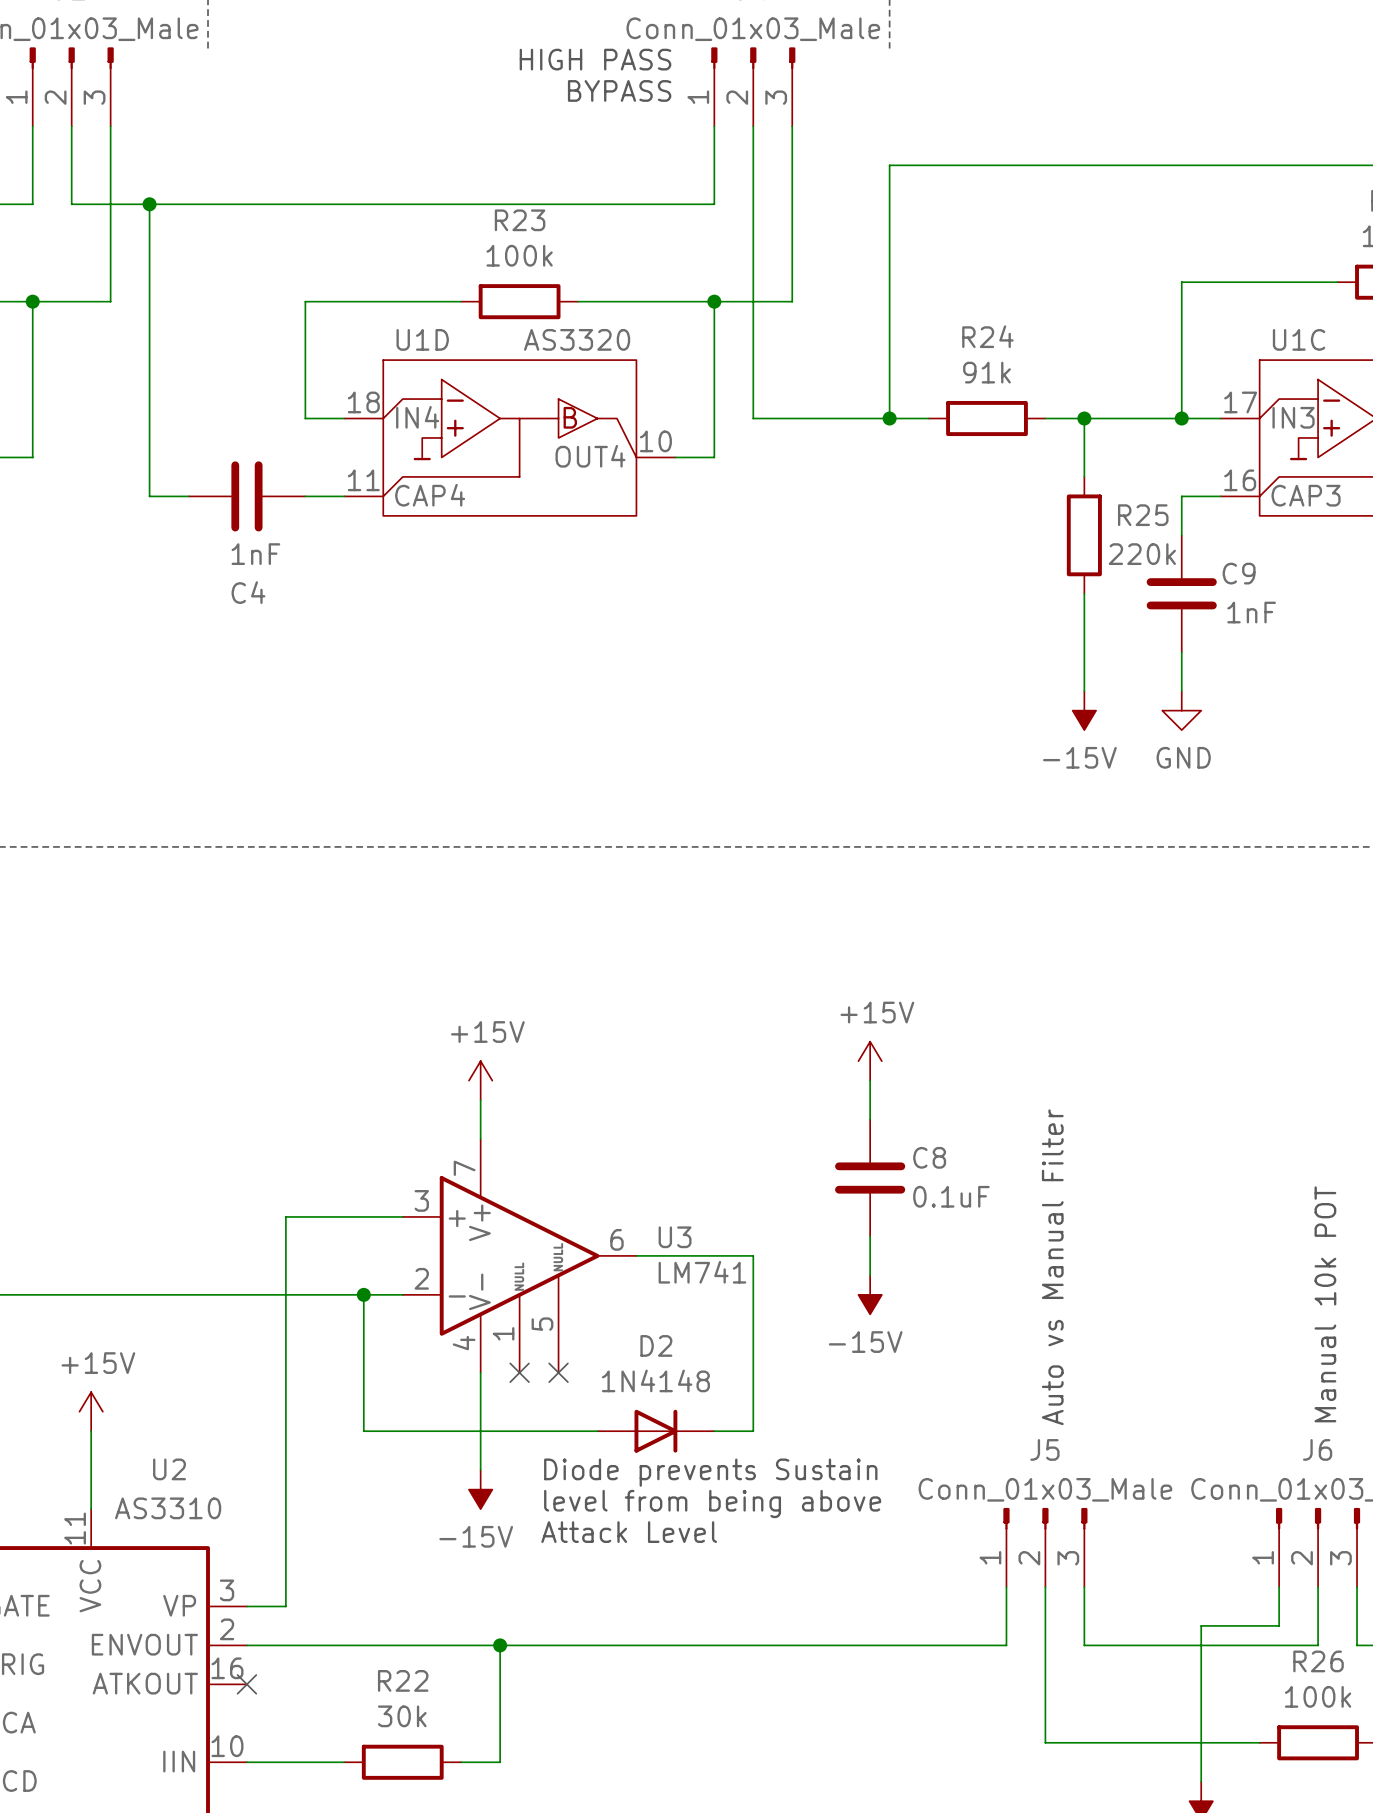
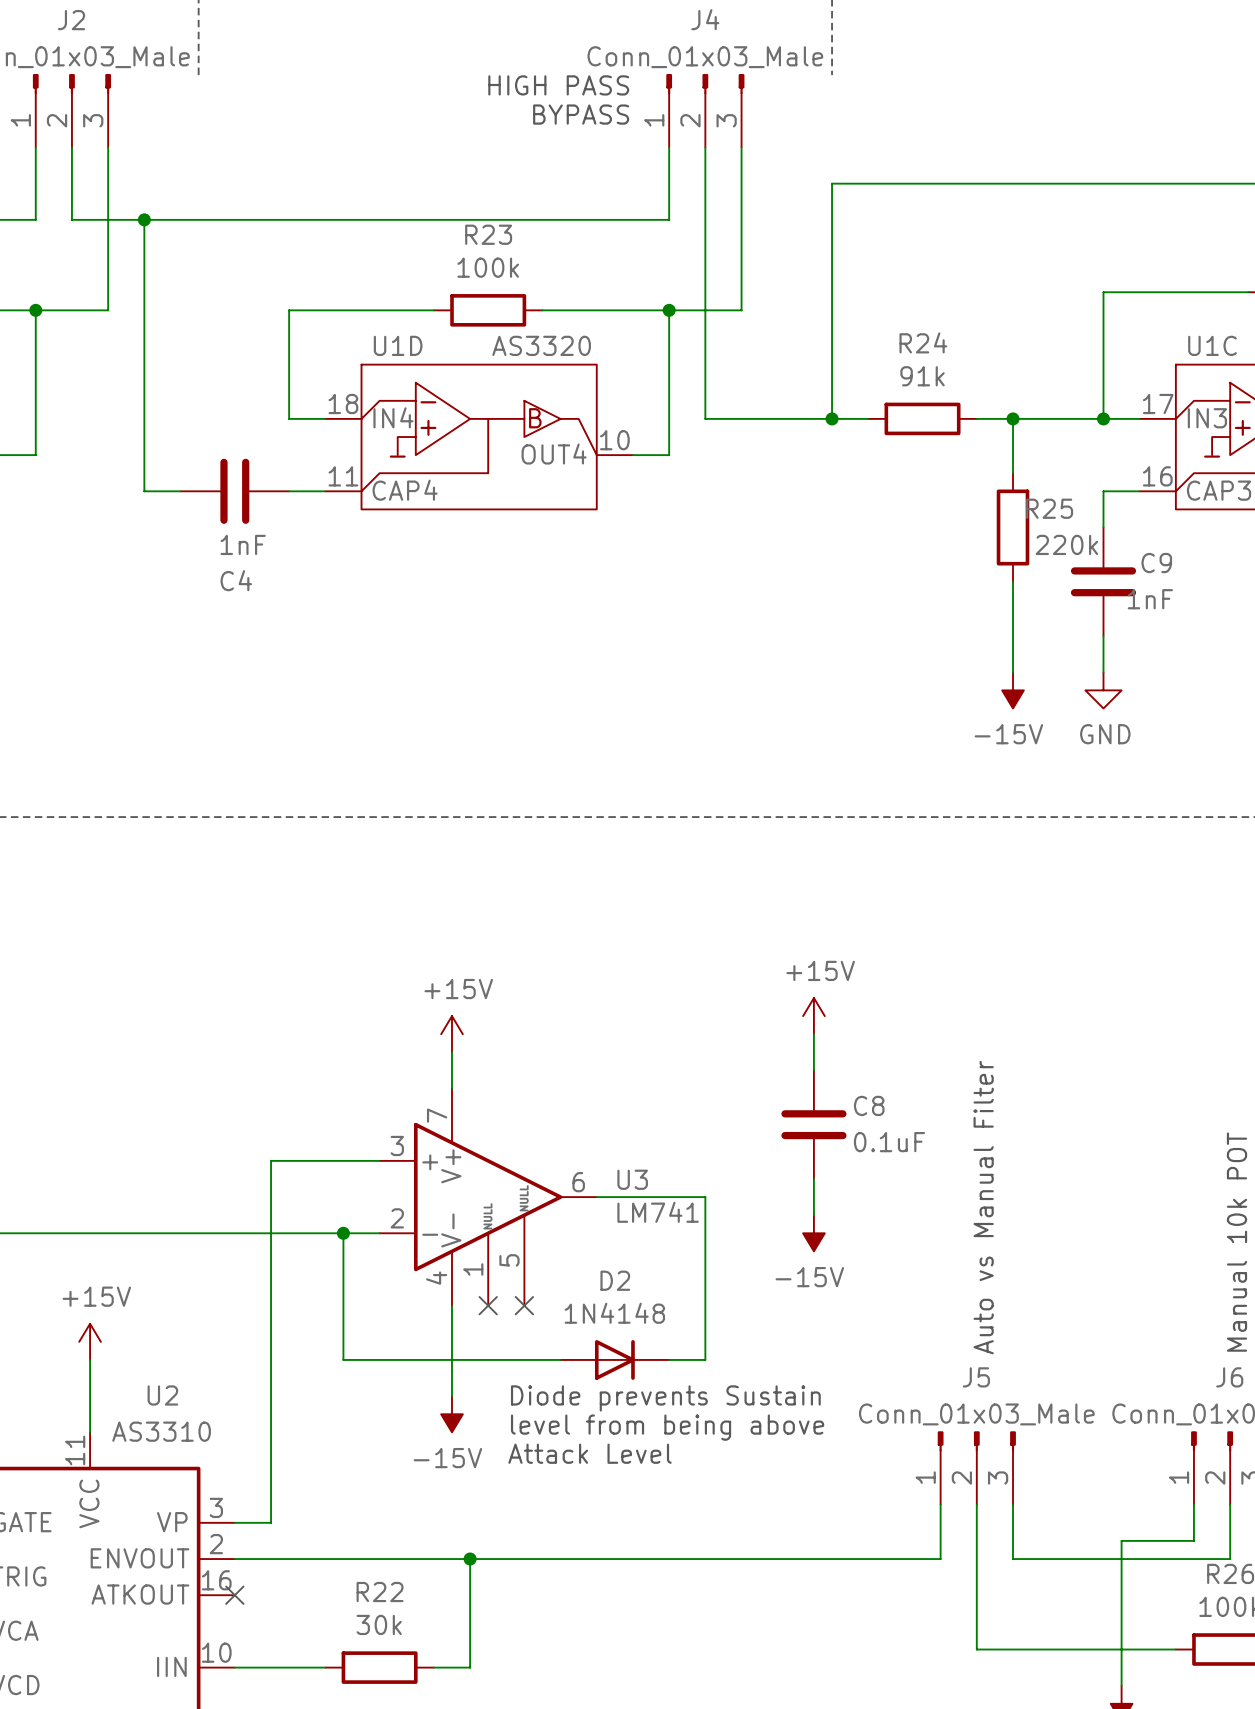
R25 name position: R25 (1143, 515) -> R25 (1049, 508)
C9 value position: 1nF (1251, 612) -> 1nF (1150, 599)

